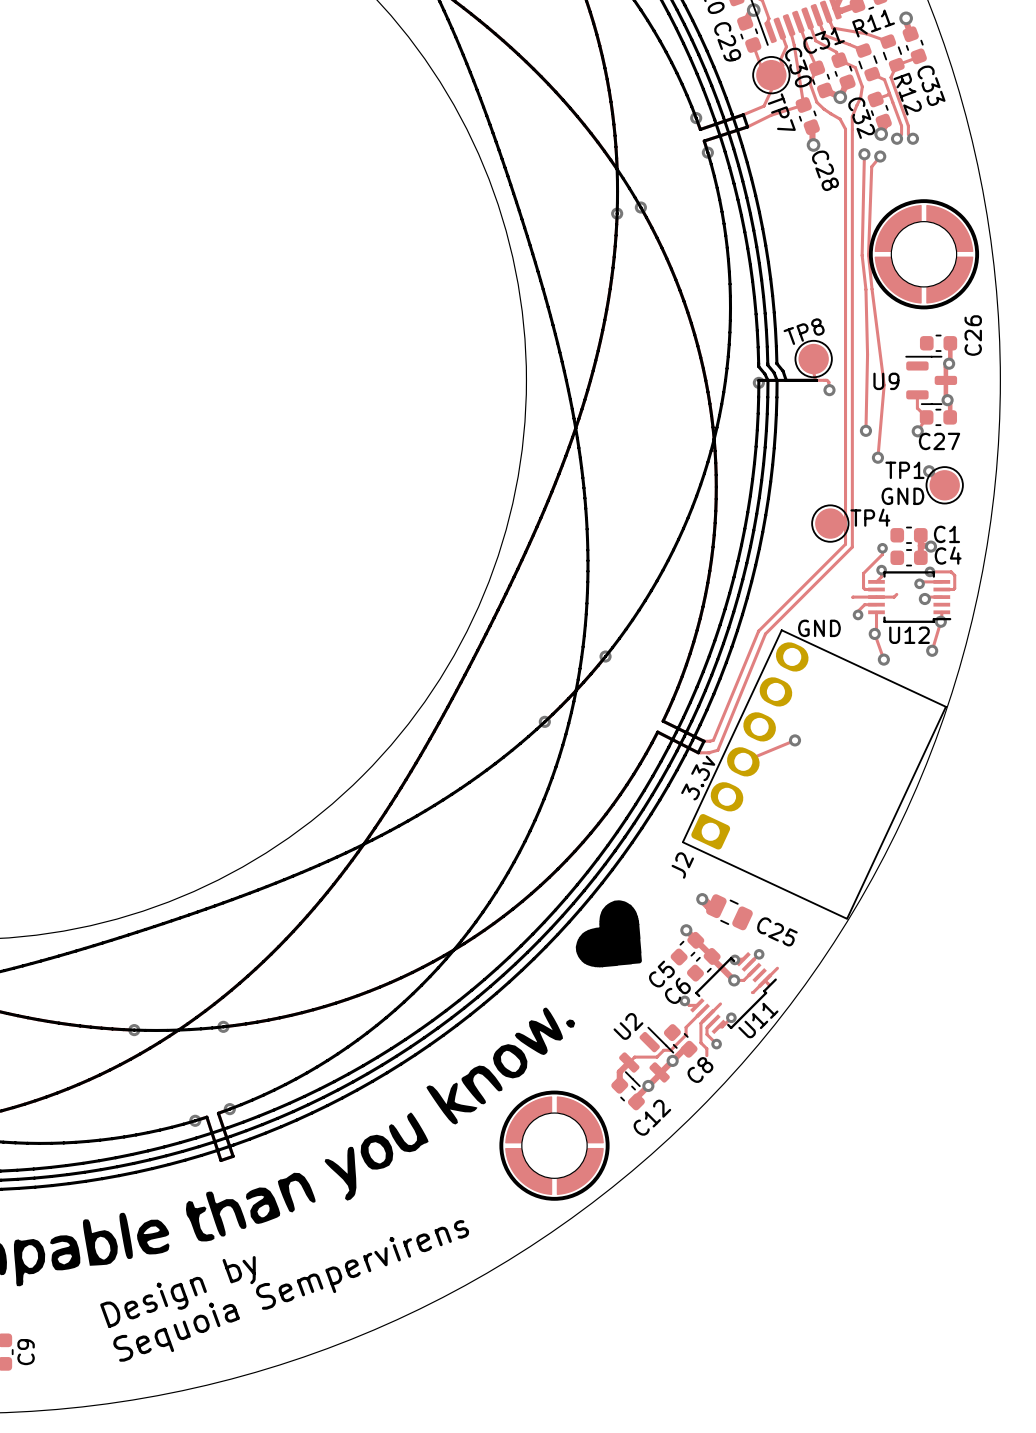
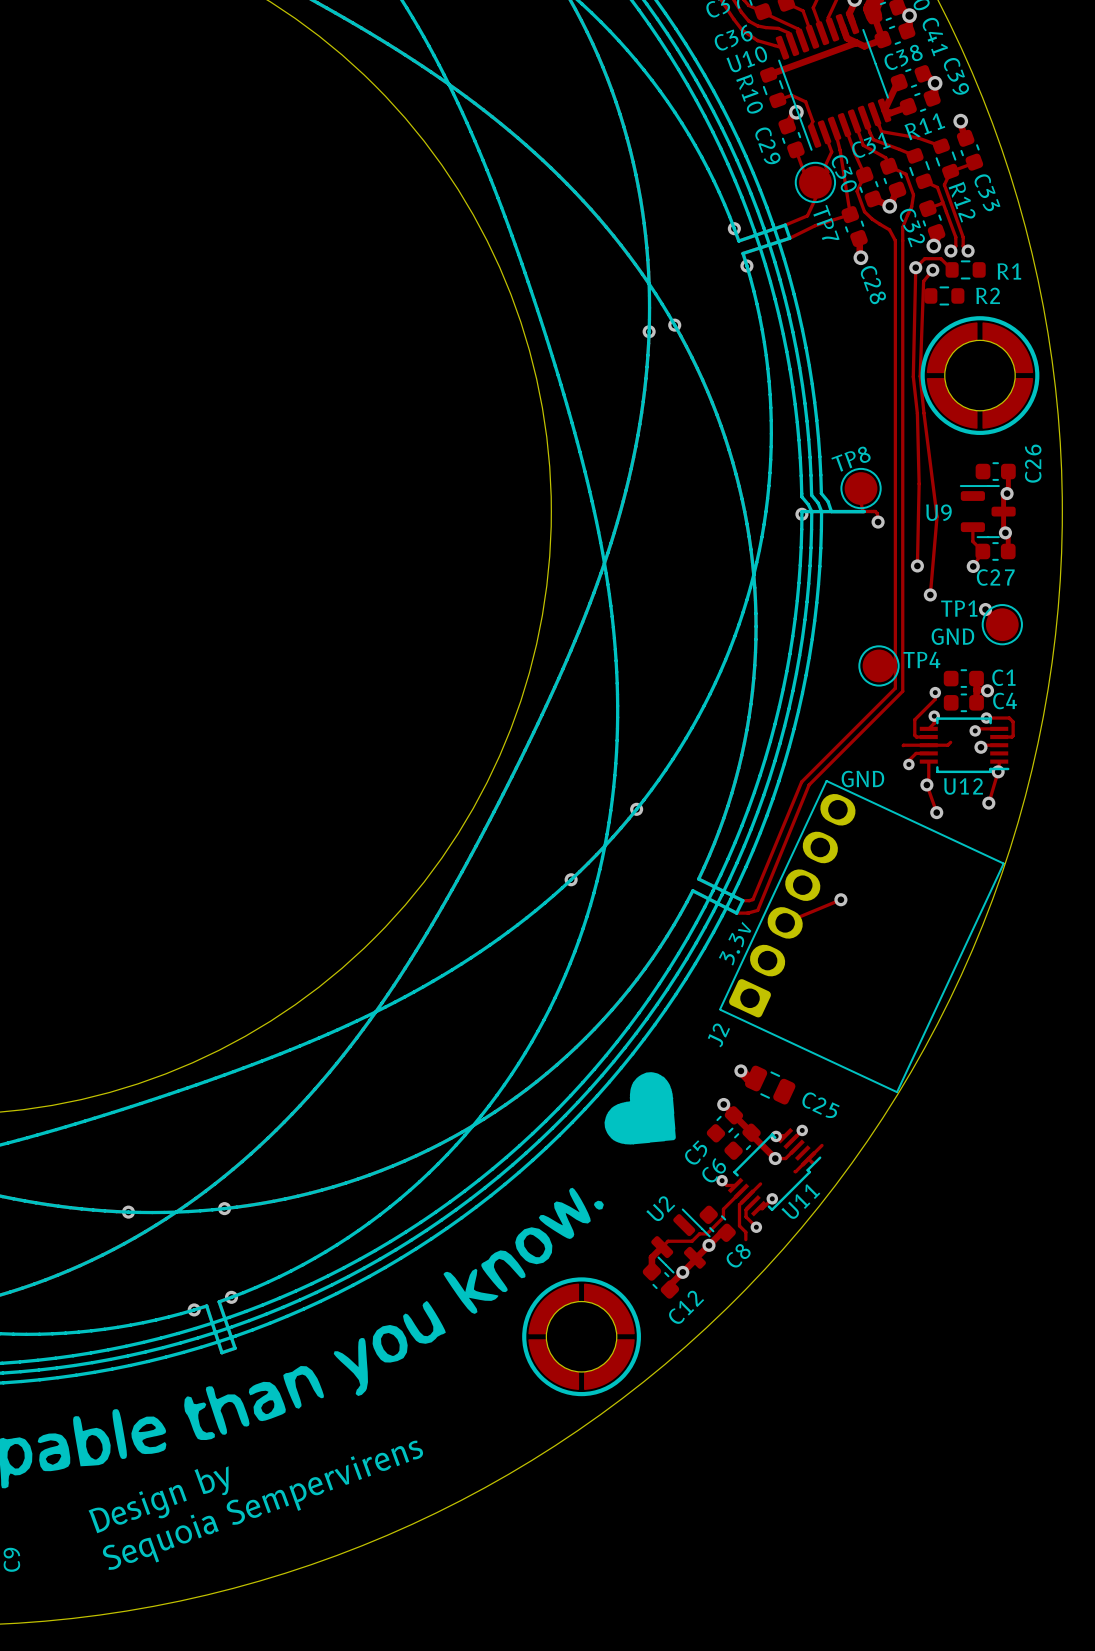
track: none -> (915, 267) (924, 258) (940, 258) (952, 269)
R1: none -> (965, 269)
R2: none -> (944, 295)

